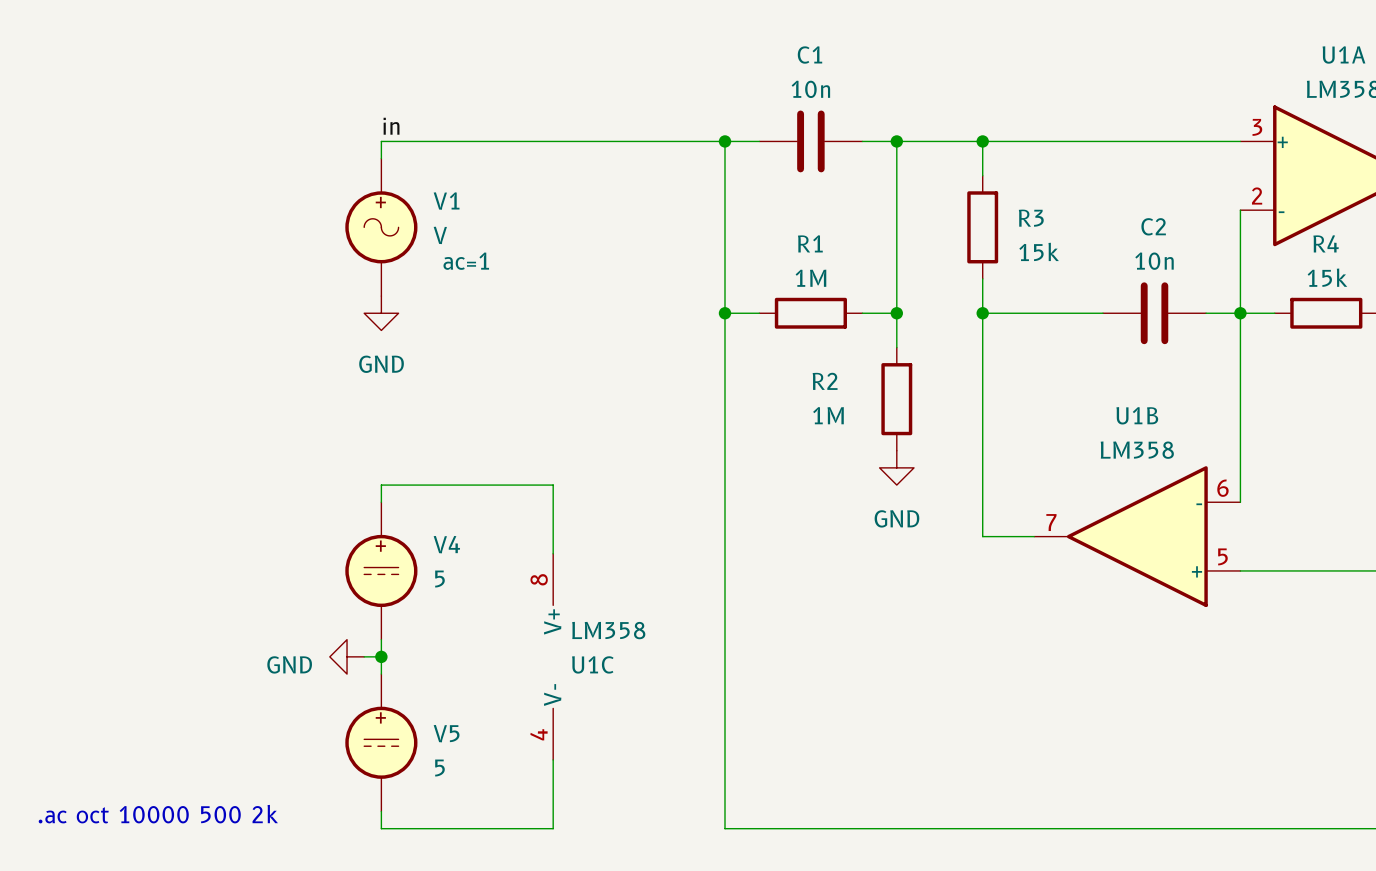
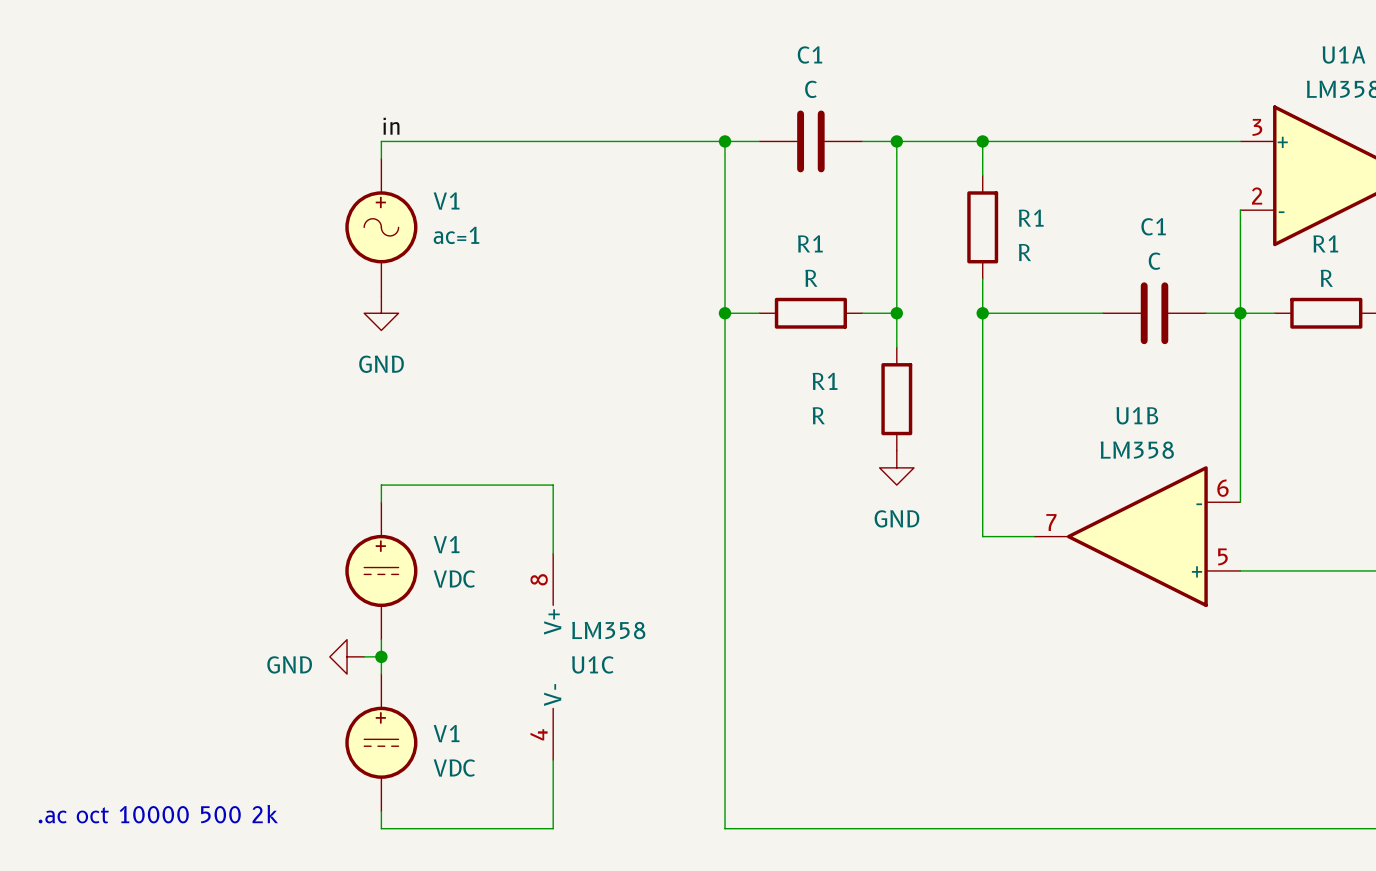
C1 value: 10n (810, 89) -> C (810, 89)
R3 name: R3 (1031, 218) -> R1 (1031, 218)
C2 name: C2 (1153, 226) -> C1 (1153, 226)
V1 value: V (440, 235) -> ac=1 (456, 235)
R4 name: R4 (1326, 243) -> R1 (1325, 243)
R3 value: 15k (1039, 251) -> R (1024, 252)
V1 text: ac=1 (466, 261) -> none
C2 value: 10n (1154, 261) -> C (1154, 261)
R4 value: 15k (1327, 277) -> R (1326, 278)
R1 value: 1M (810, 278) -> R (811, 278)
R2 name: R2 (825, 381) -> R1 (825, 381)
R2 value: 1M (828, 415) -> R (818, 415)
V4 name: V4 (446, 544) -> V1 (446, 544)
V4 value: 5 (439, 579) -> VDC (454, 579)
V5 name: V5 (446, 733) -> V1 (446, 733)
V5 value: 5 (439, 768) -> VDC (454, 768)

